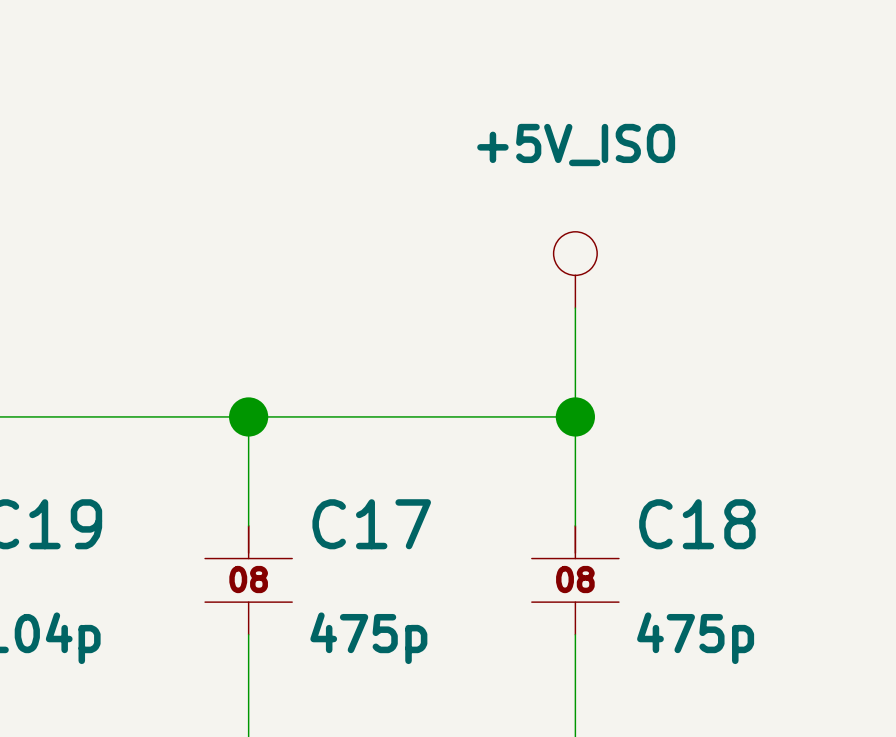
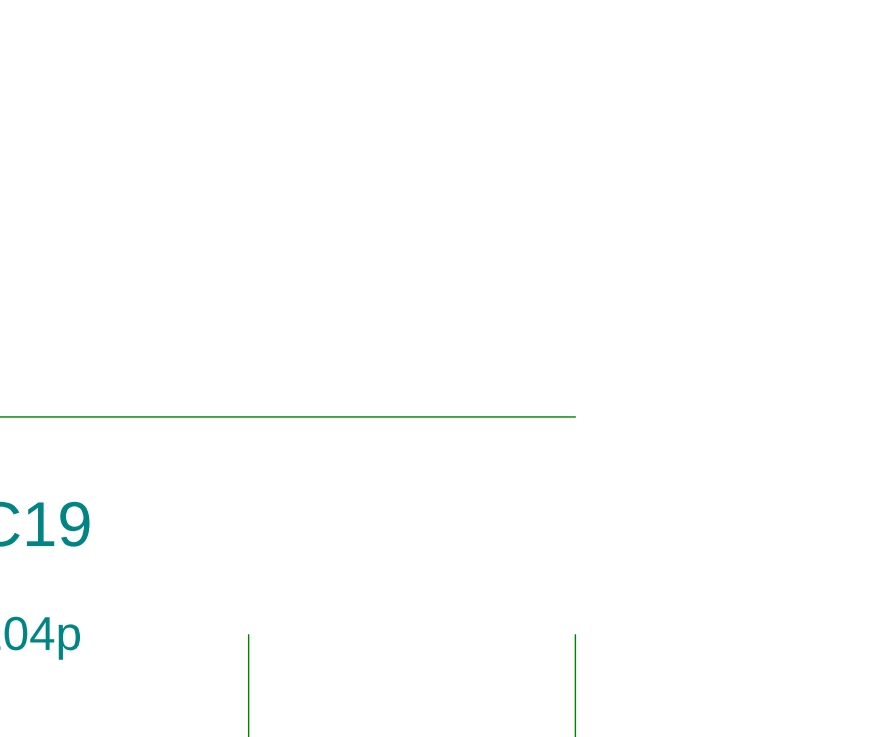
power symbol: +5V_ISO (575, 269) -> none
wire: (575, 308) (575, 525) -> none
wire: (248, 416) (248, 525) -> none
junction: (248, 416) -> none
junction: (575, 416) -> none
C17: (248, 580) -> none
C18: (575, 580) -> none

